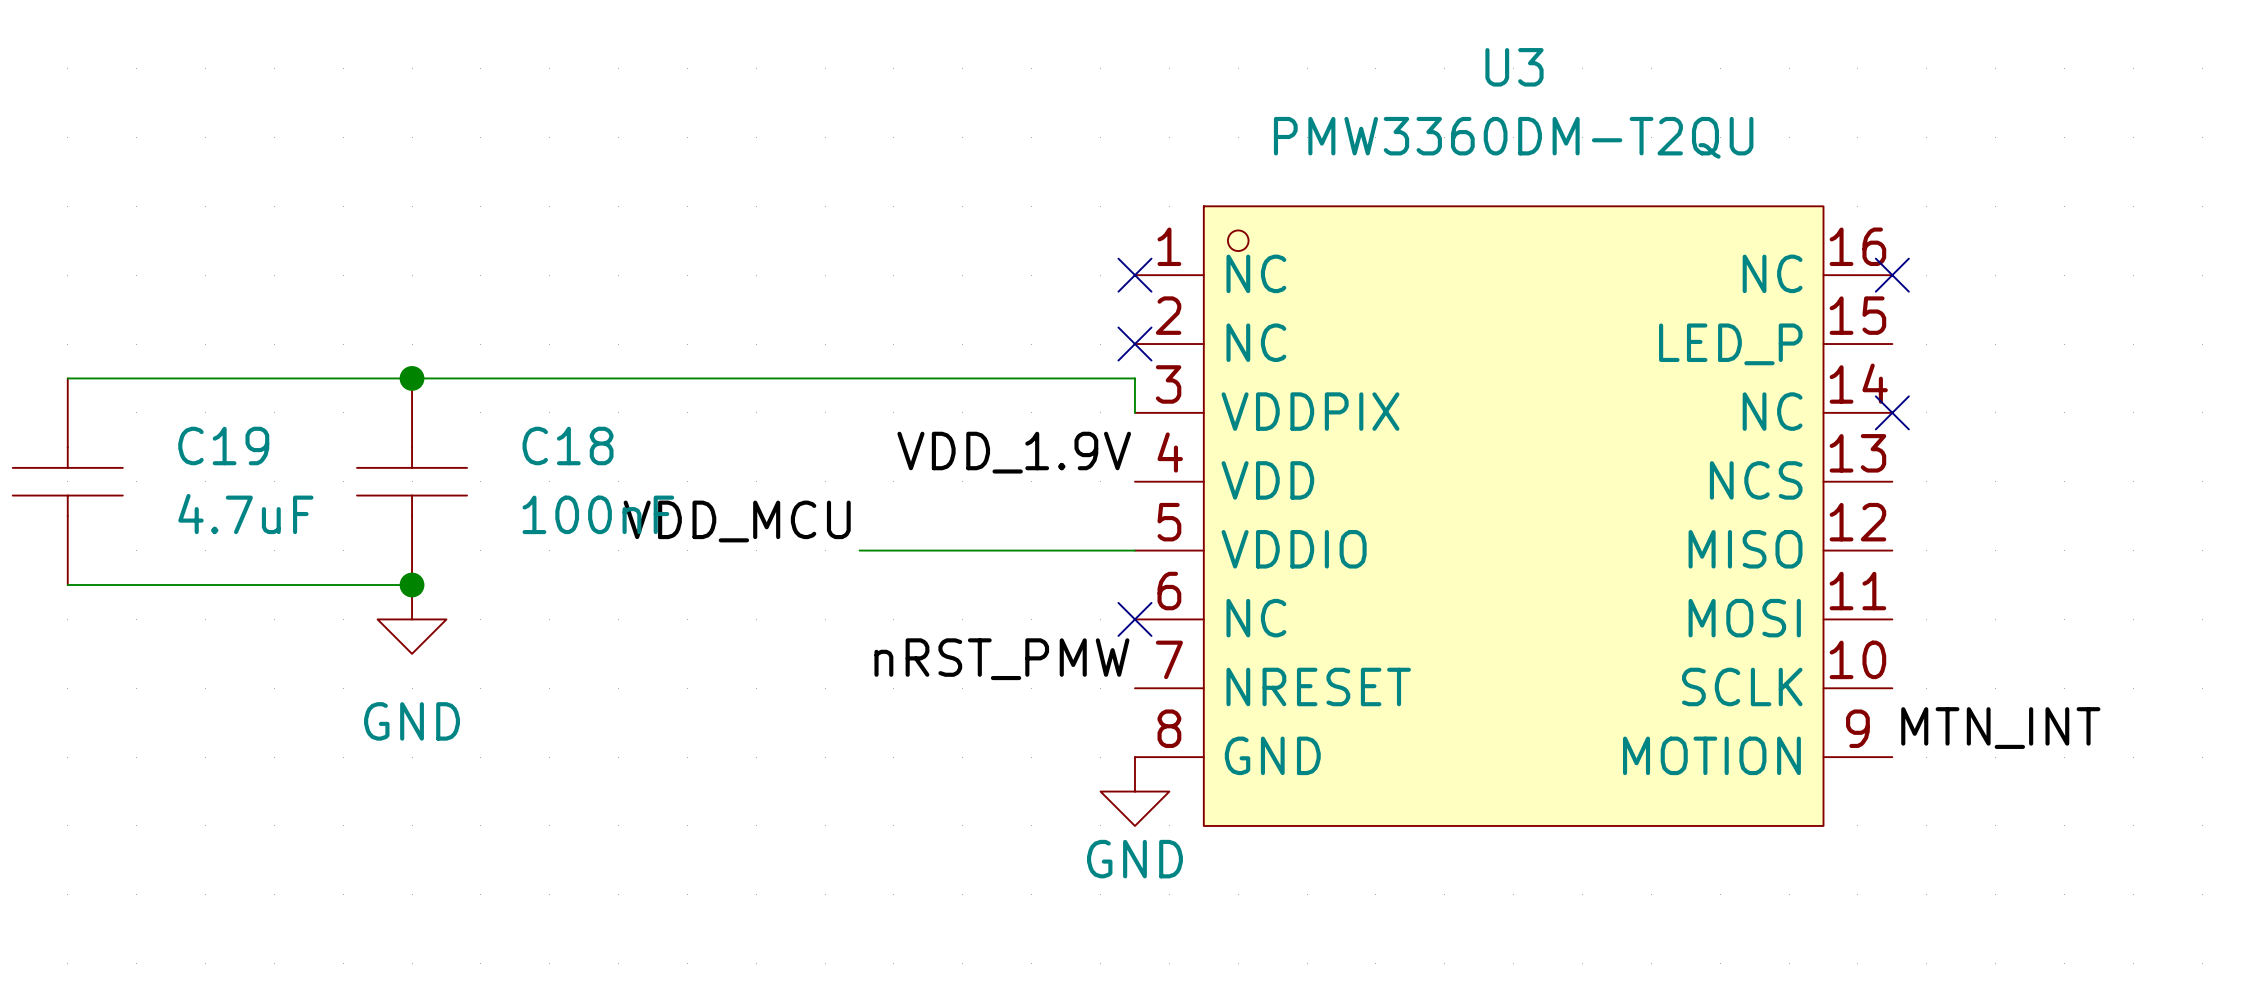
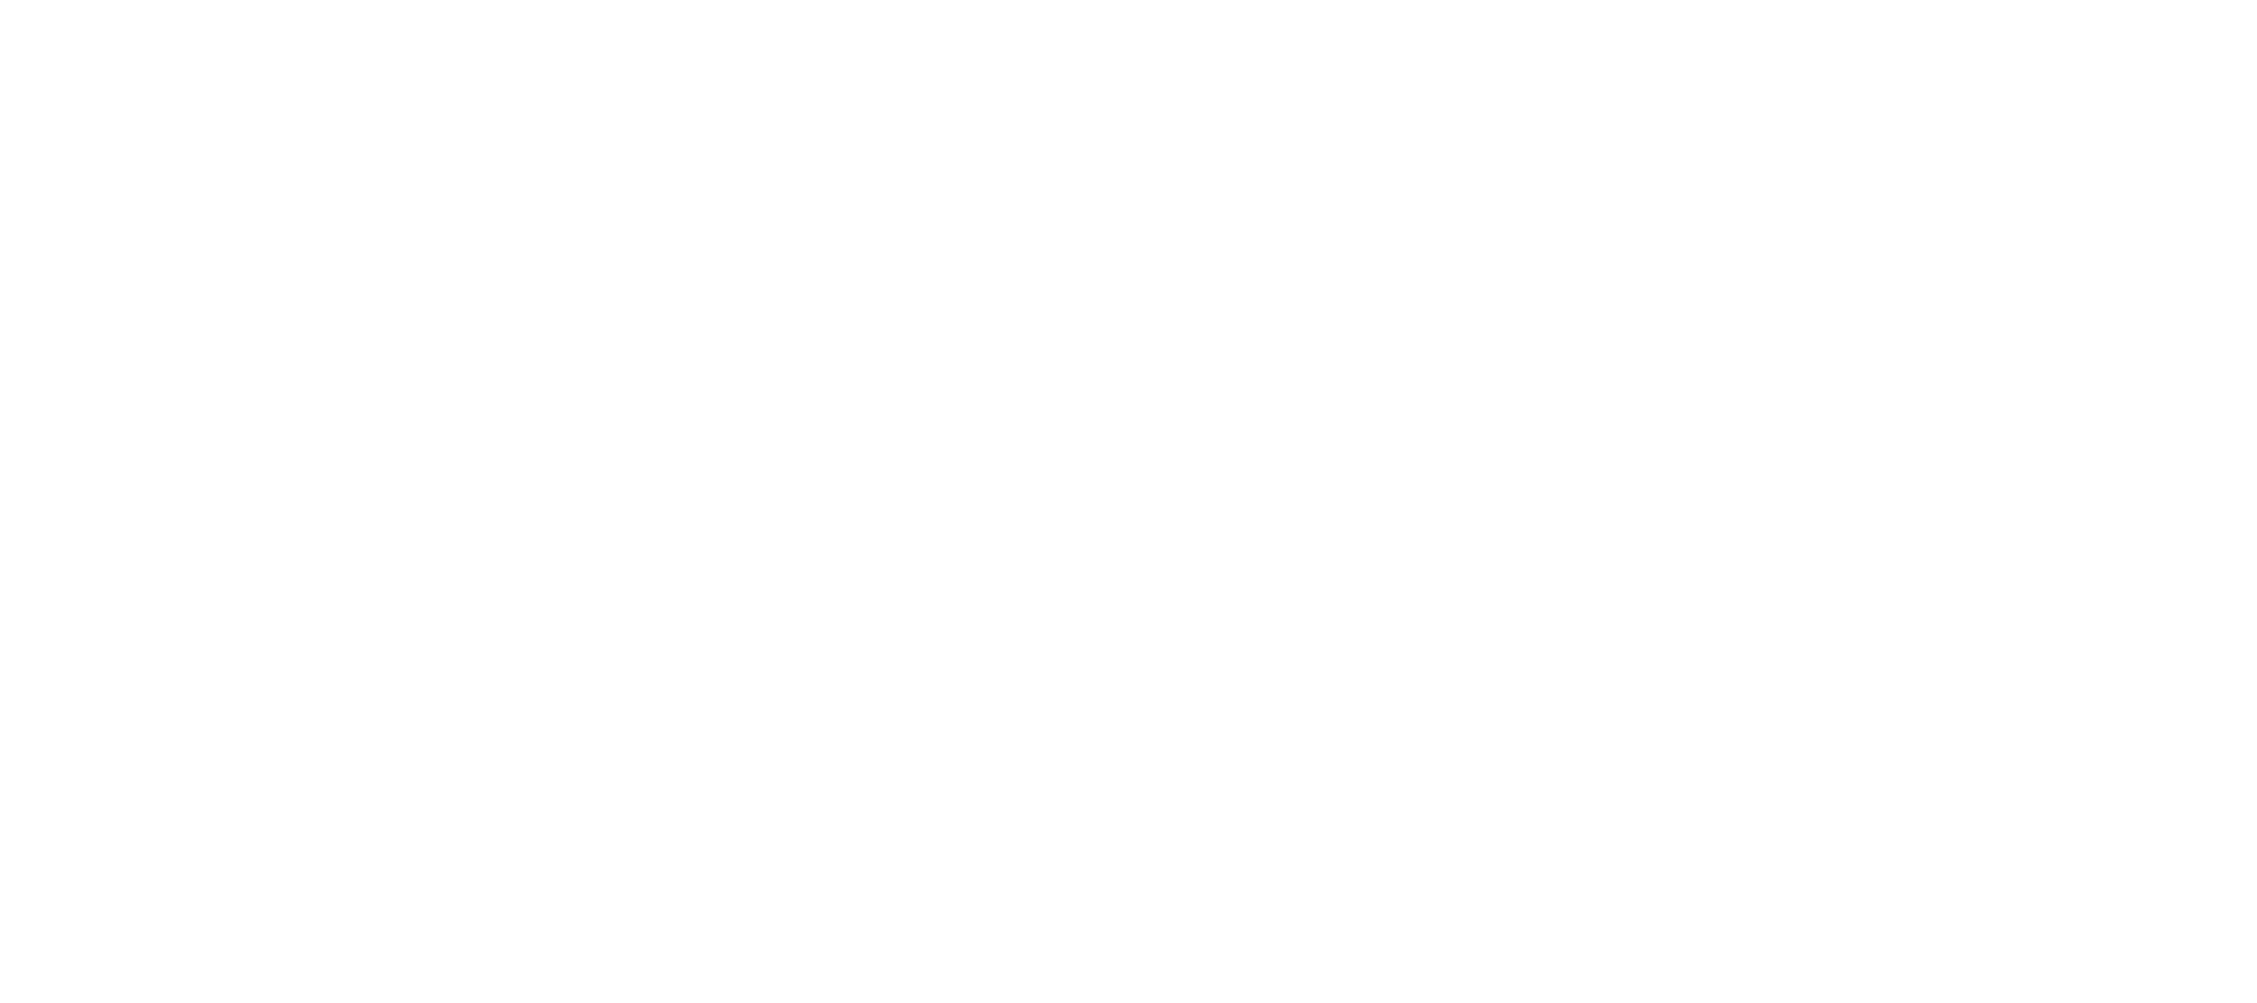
no-connect mark: (1134, 275) -> none
no-connect mark: (1892, 275) -> none
no-connect mark: (1134, 344) -> none
wire: (67, 378) (1134, 378) (1134, 412) -> none
junction: (412, 378) -> none
no-connect mark: (1892, 412) -> none
label: VDD_1.9V (1014, 452) -> none
C19: (67, 481) -> none
C18: (412, 481) -> none
U3: PMW3360DM-T2QU (1513, 516) -> none
label: VDD_MCU (737, 521) -> none
wire: (859, 550) (1134, 550) -> none
wire: (67, 584) (412, 584) -> none
junction: (412, 584) -> none
power symbol: GND (412, 619) -> none
no-connect mark: (1134, 619) -> none
label: nRST_PMW (1001, 659) -> none
label: MTN_INT (2000, 728) -> none
power symbol: GND (1134, 791) -> none

